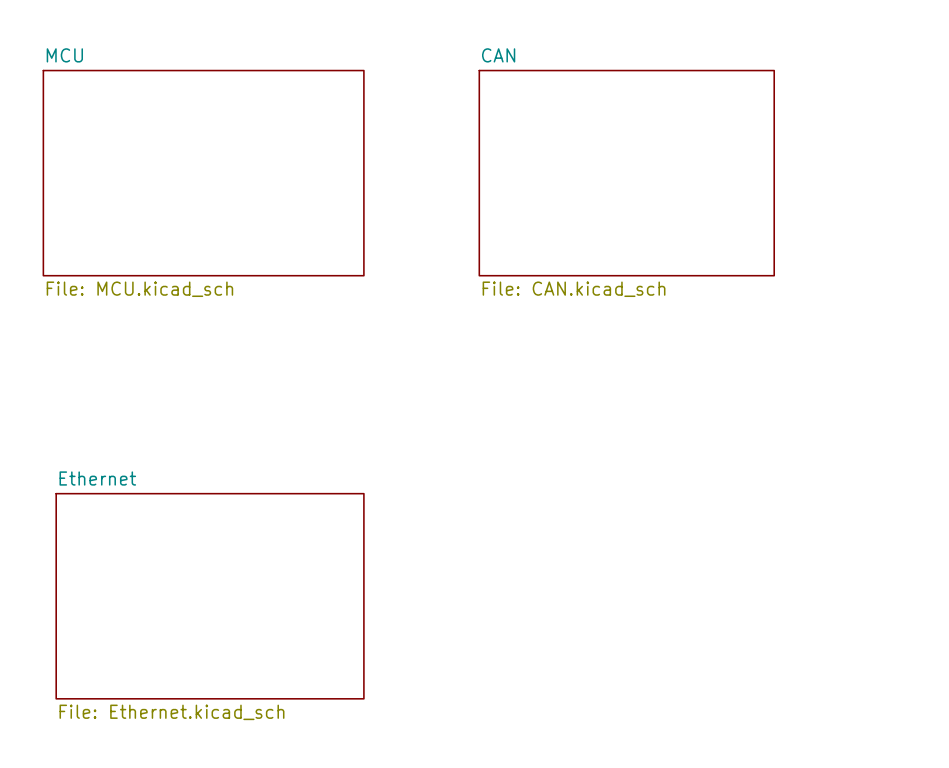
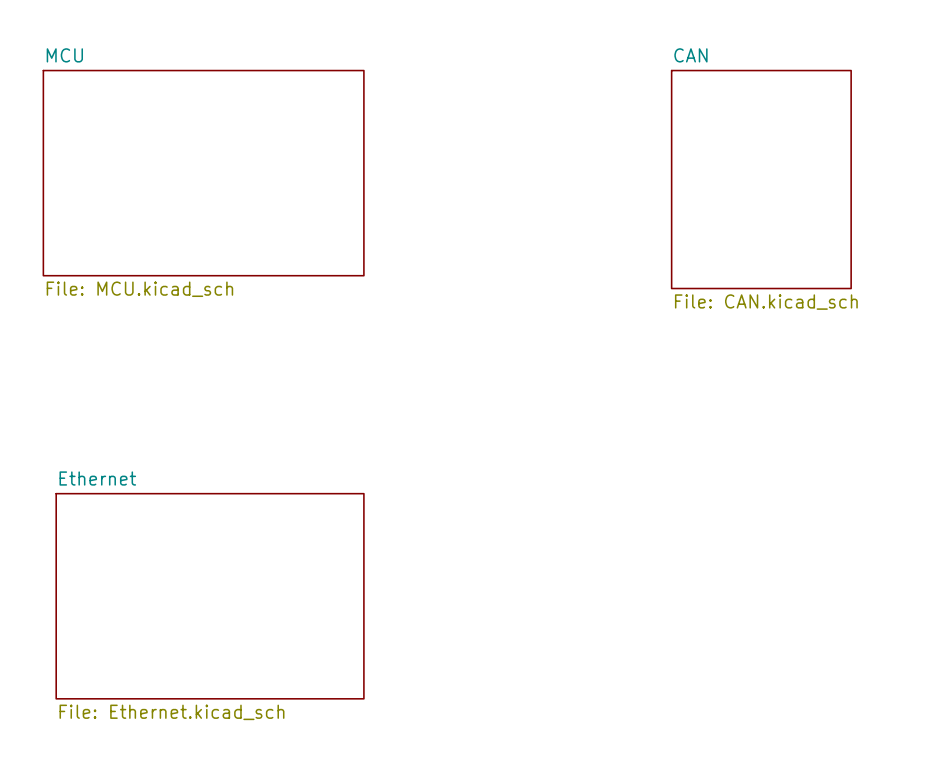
sheet CAN: File: CAN.kicad_sch (626, 173) -> none
sheet CAN: none -> File: CAN.kicad_sch (761, 179)

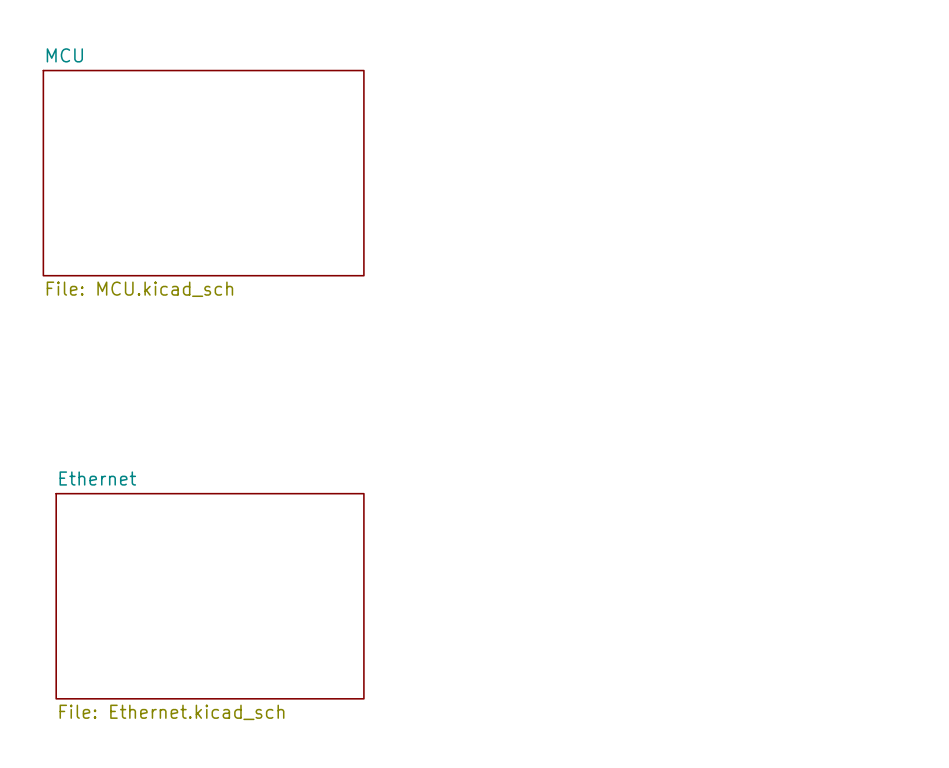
sheet CAN: File: CAN.kicad_sch (761, 179) -> none

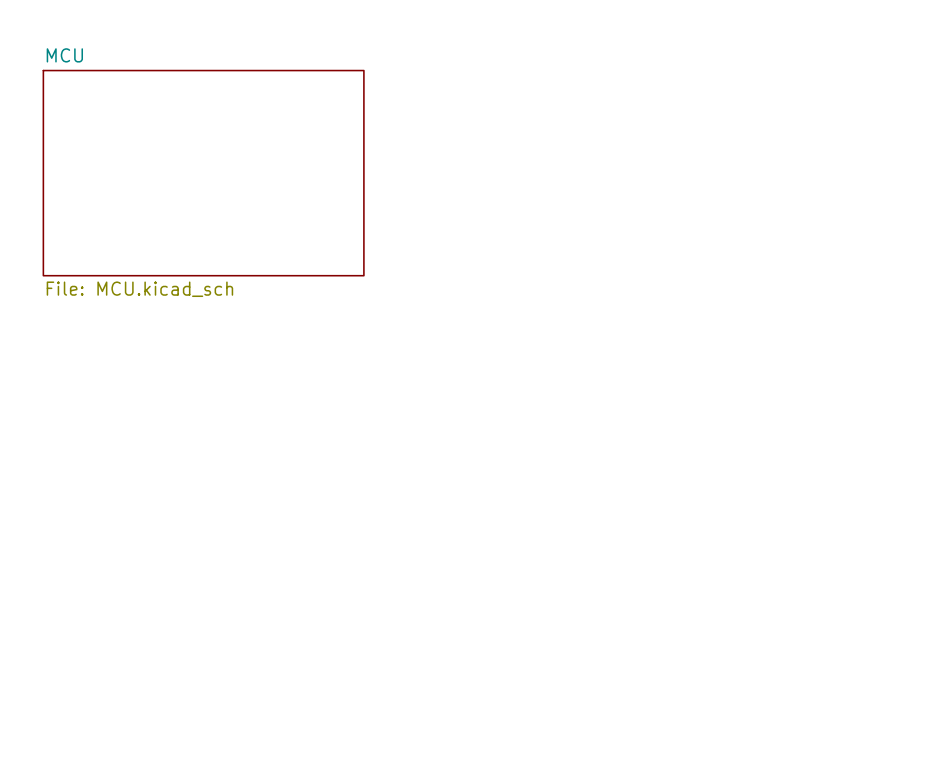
sheet Ethernet: File: Ethernet.kicad_sch (210, 596) -> none

